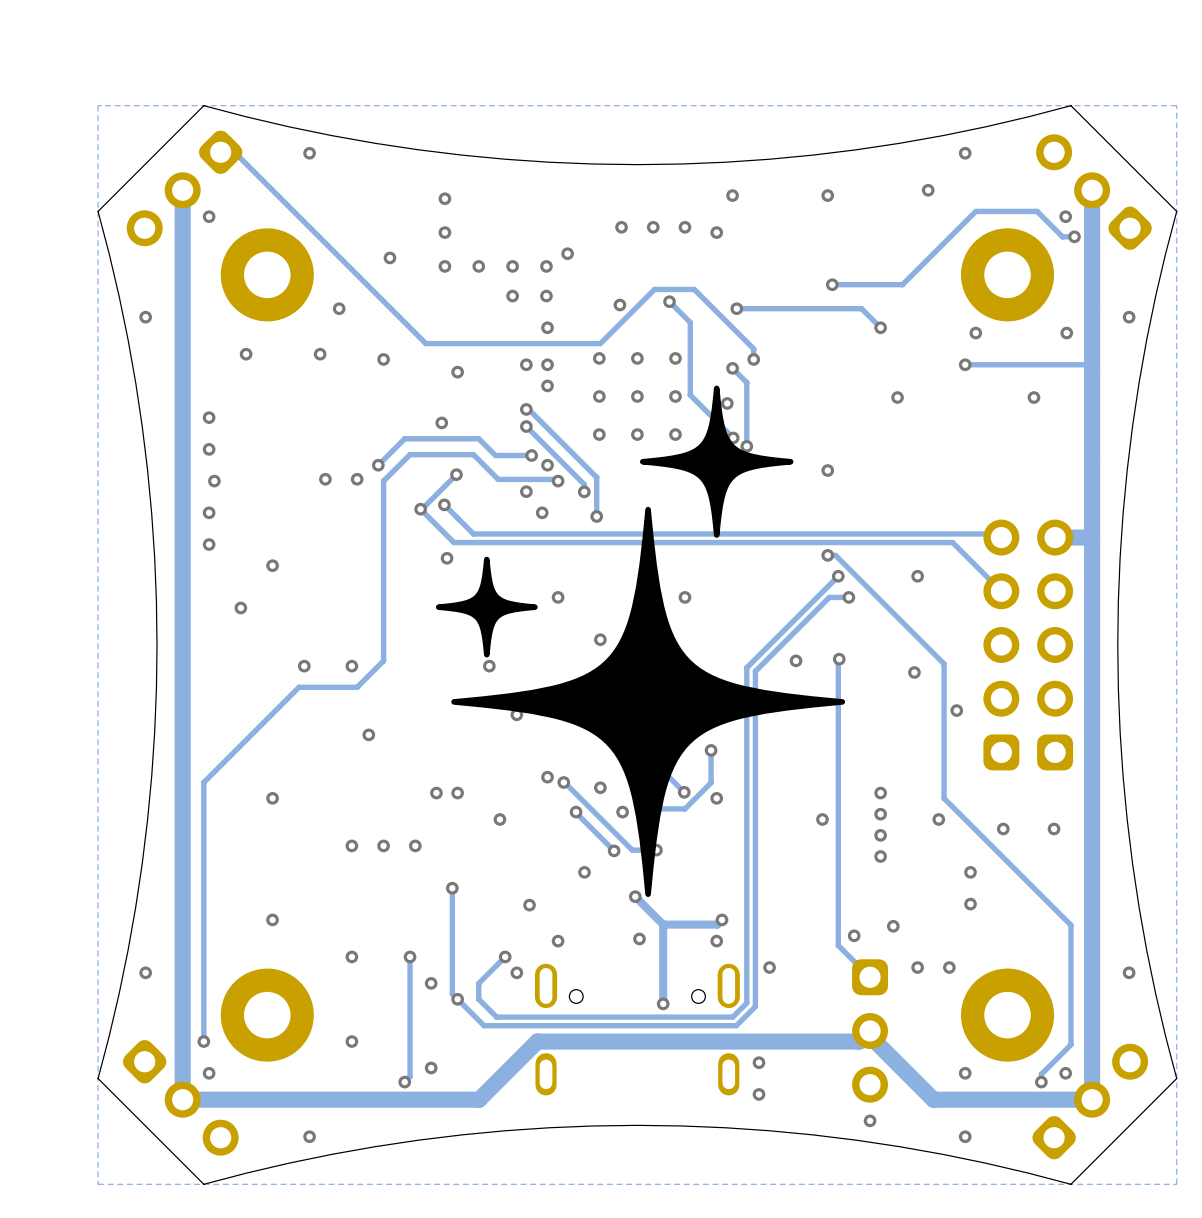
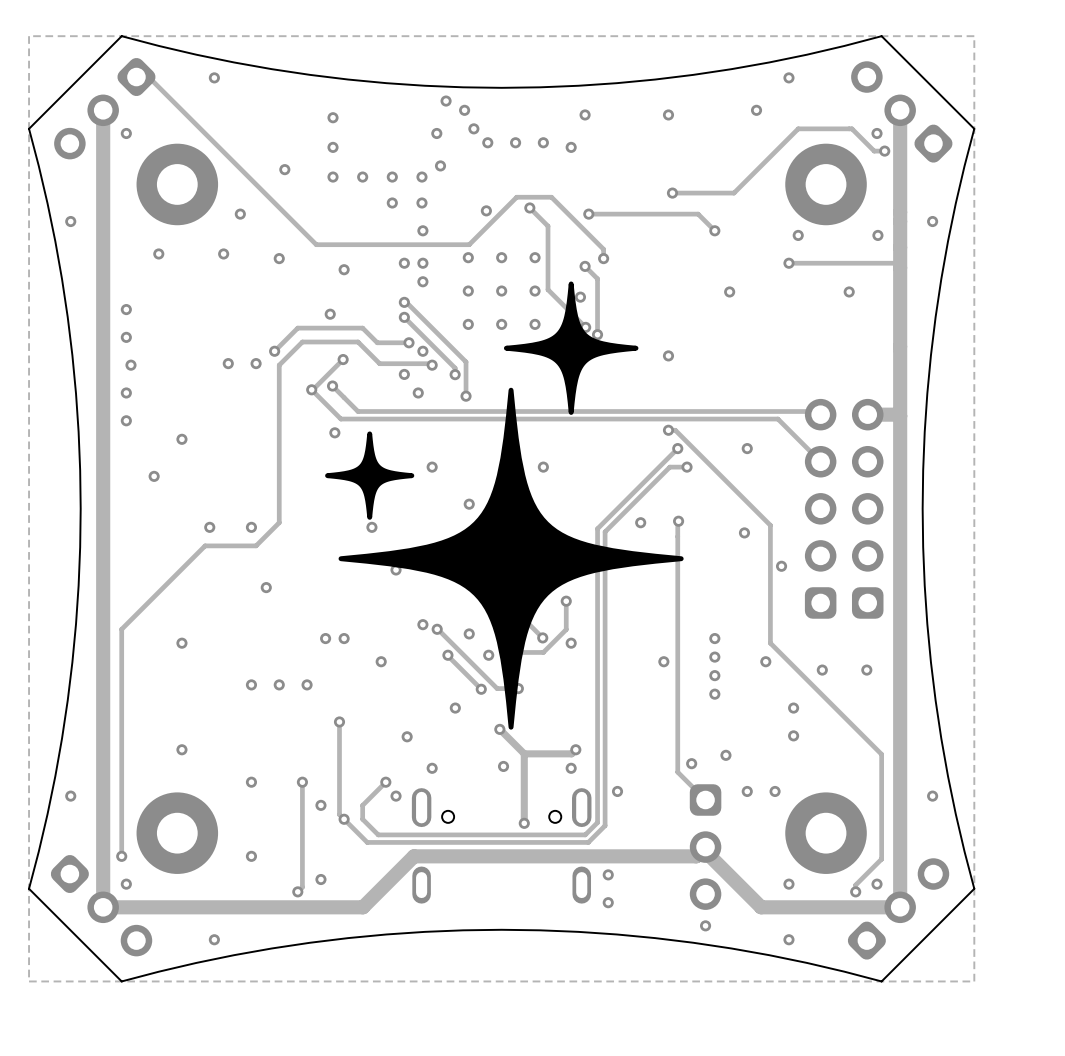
via: none -> (446, 101)
via: none -> (464, 110)
via: none -> (473, 128)
via: none -> (436, 133)

